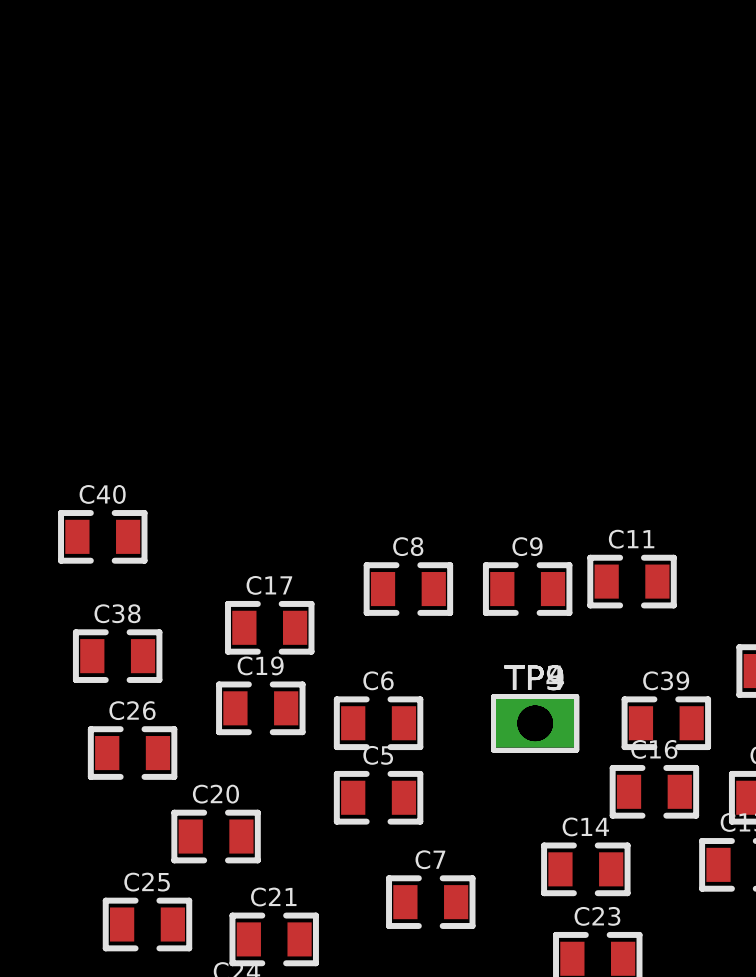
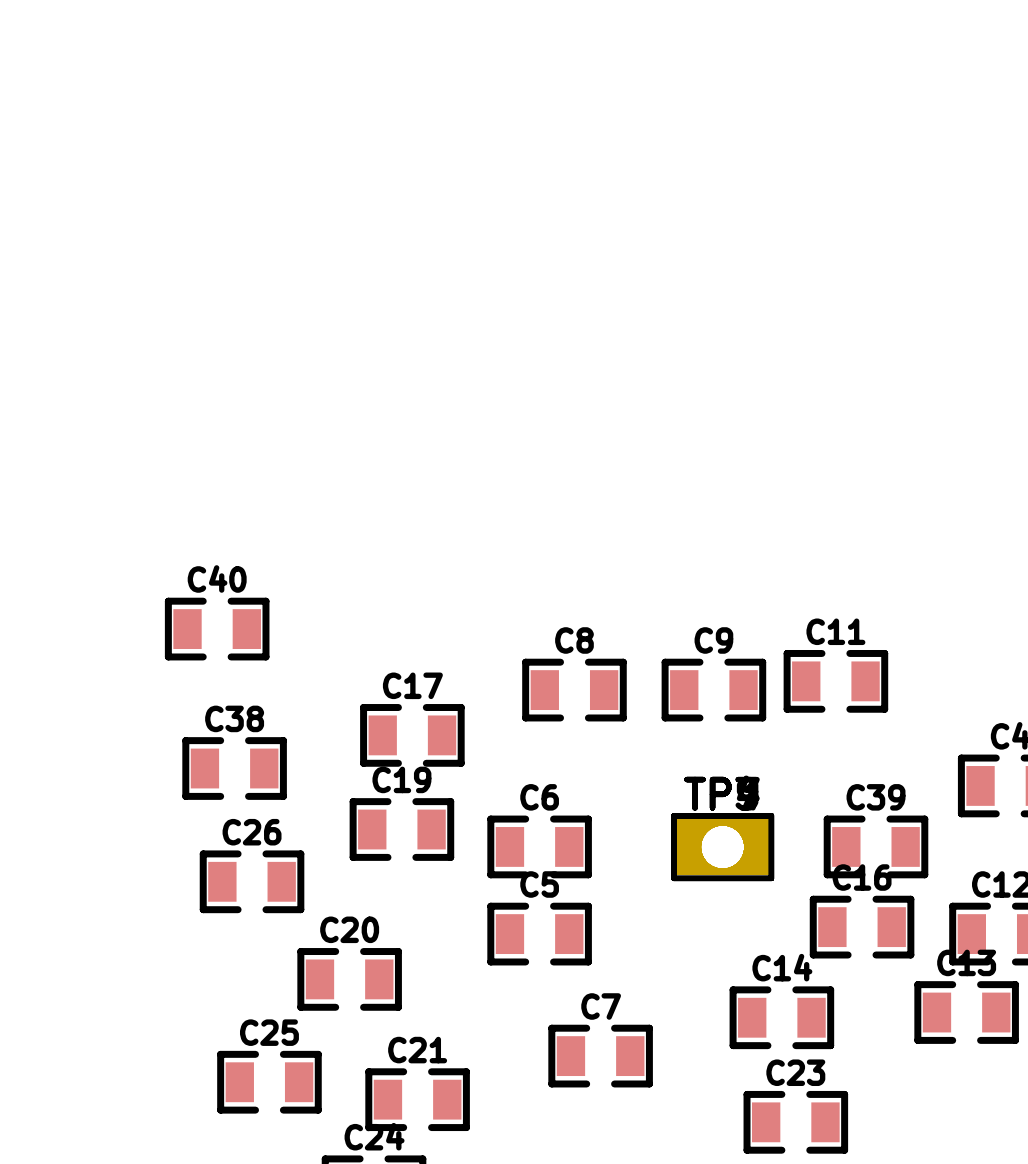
part: none -> (722, 847)

